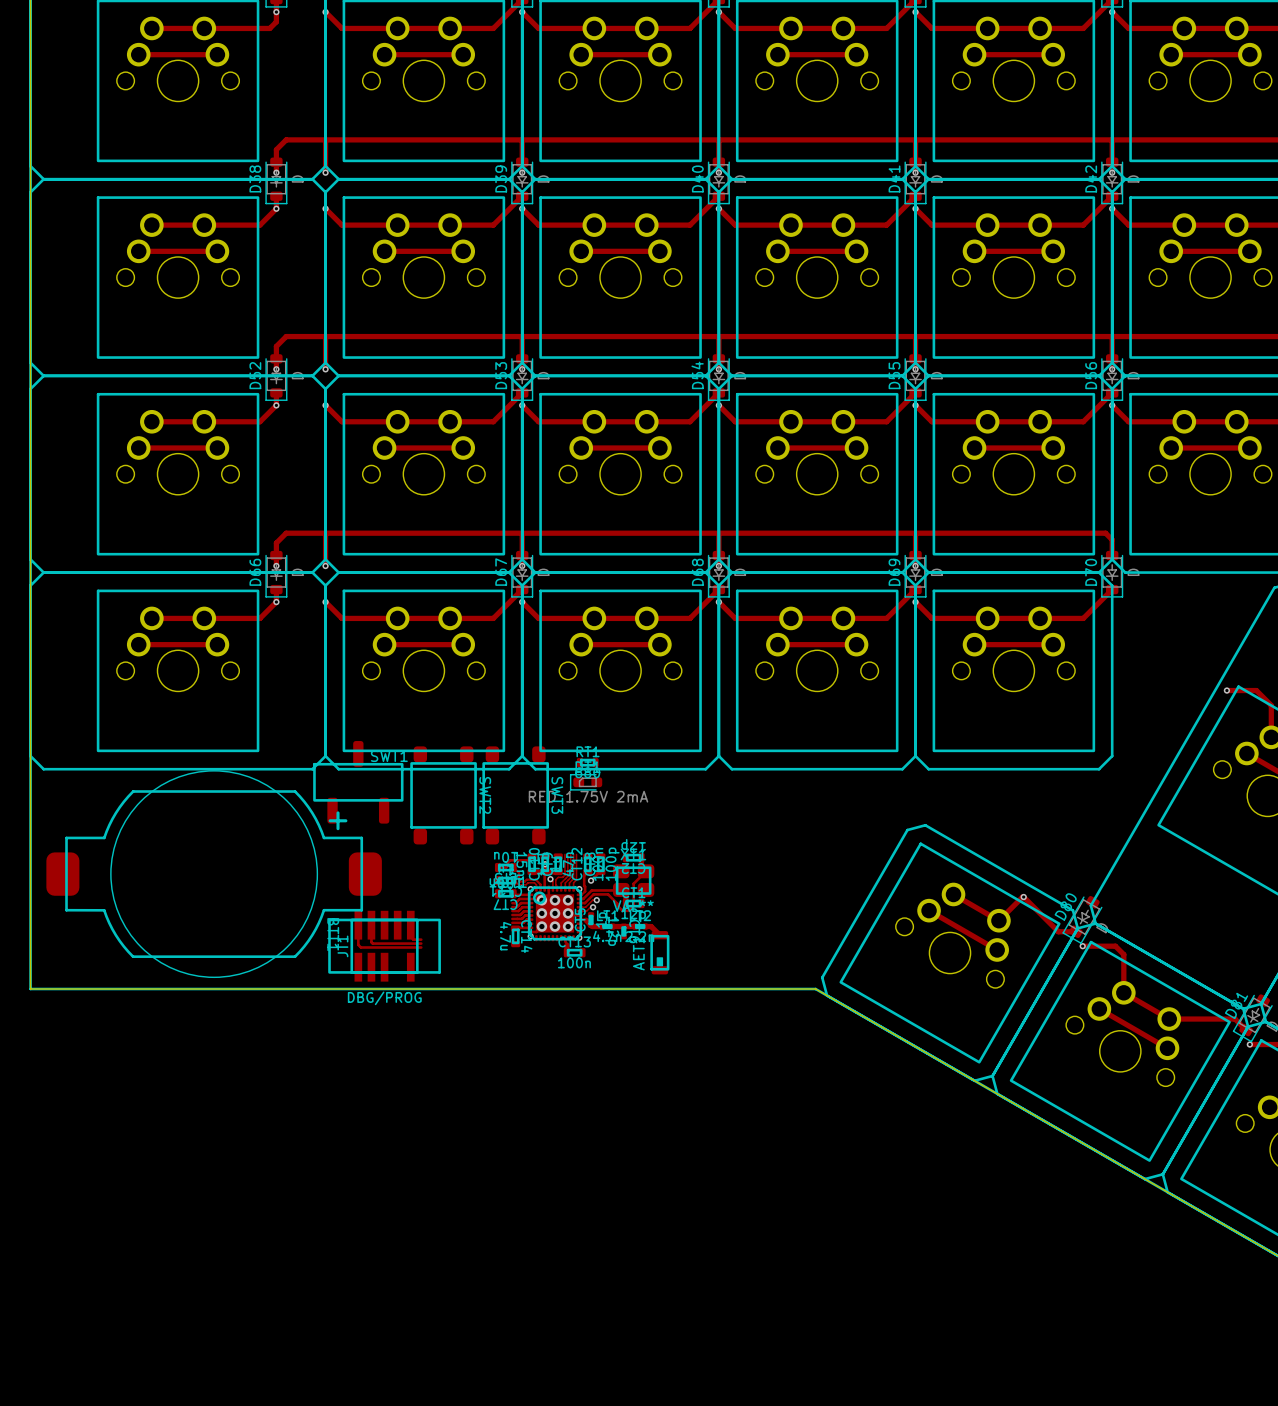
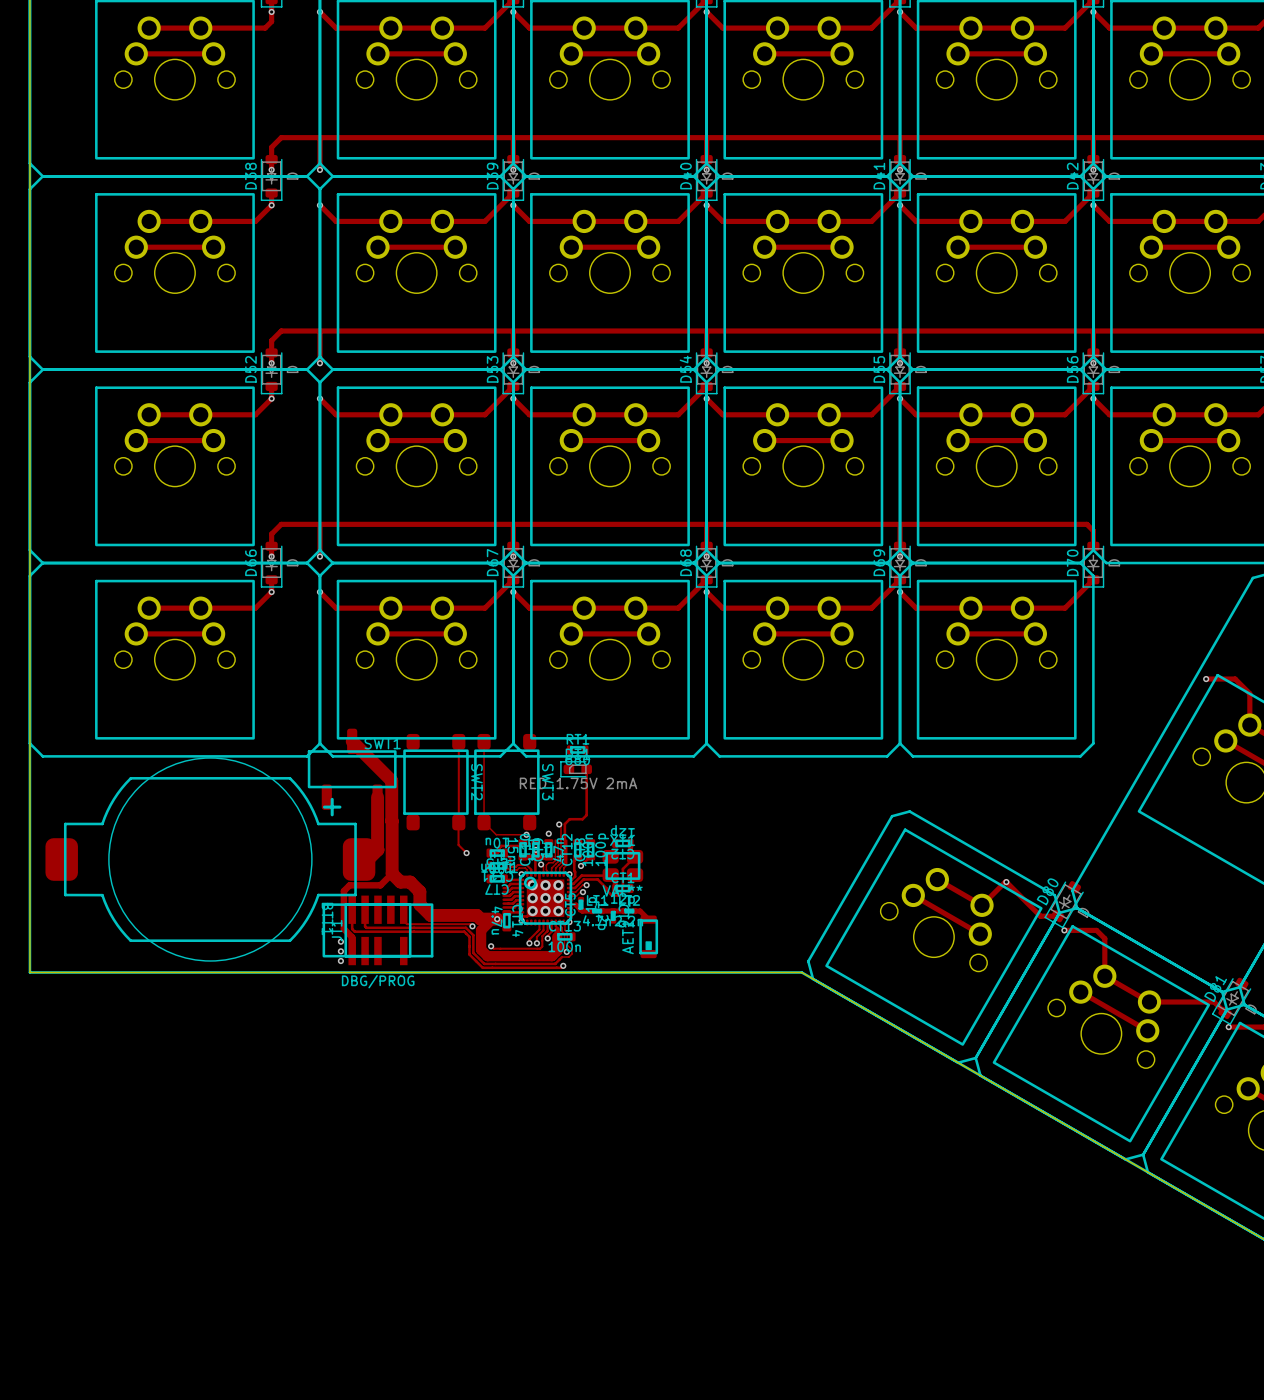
track: none -> (352, 741) (391, 780) (392, 873)
track: none -> (458, 741) (458, 822)
track: none -> (484, 741) (484, 822) (496, 834) (526, 834)
track: none -> (377, 797) (377, 849) (368, 859) (359, 859)
track: none -> (458, 822) (458, 845) (466, 853)
track: none -> (559, 824) (561, 826) (561, 840)
via: none -> (559, 824)
via: none -> (548, 833)
via: none -> (526, 834)
track: (573, 854) (573, 878) -> (586, 769) (586, 815) (582, 819) (569, 819) (564, 824) (563, 864)
via: none -> (466, 853)
track: none -> (392, 873) (400, 882) (410, 882) (419, 891) (419, 904) (430, 915) (476, 915) (480, 919) (497, 919) (492, 919) (481, 930) (481, 949) (487, 956) (551, 956) (557, 950) (557, 936)
track: none -> (392, 873) (380, 885) (349, 885) (343, 891) (343, 929) (352, 937) (352, 951)
via: none -> (497, 919)
track: (410, 936) (413, 939) (421, 939) -> (403, 920) (406, 924) (470, 924) (472, 926)
track: none -> (539, 922) (539, 929) (529, 939) (529, 943)
track: none -> (543, 922) (543, 930) (536, 936) (536, 943)
track: none -> (547, 922) (547, 931) (542, 936) (542, 946) (540, 948) (493, 948) (491, 946)
track: none -> (551, 922) (551, 931) (547, 938)
track: none -> (559, 922) (564, 933) (564, 949) (566, 951)
track: none -> (563, 922) (567, 932) (567, 945) (571, 949) (571, 954) (568, 957) (562, 957) (555, 963) (484, 963) (473, 952) (473, 935) (465, 927) (414, 927)
via: none -> (472, 926)
track: none -> (414, 931) (464, 931) (469, 936) (469, 954) (482, 967) (561, 967) (563, 965)
via: none -> (547, 938)
via: none -> (340, 941)
via: none -> (529, 943)
via: none -> (536, 943)
via: none -> (491, 946)
via: none -> (340, 951)
via: none -> (566, 951)
via: none -> (340, 961)
via: none -> (563, 965)

